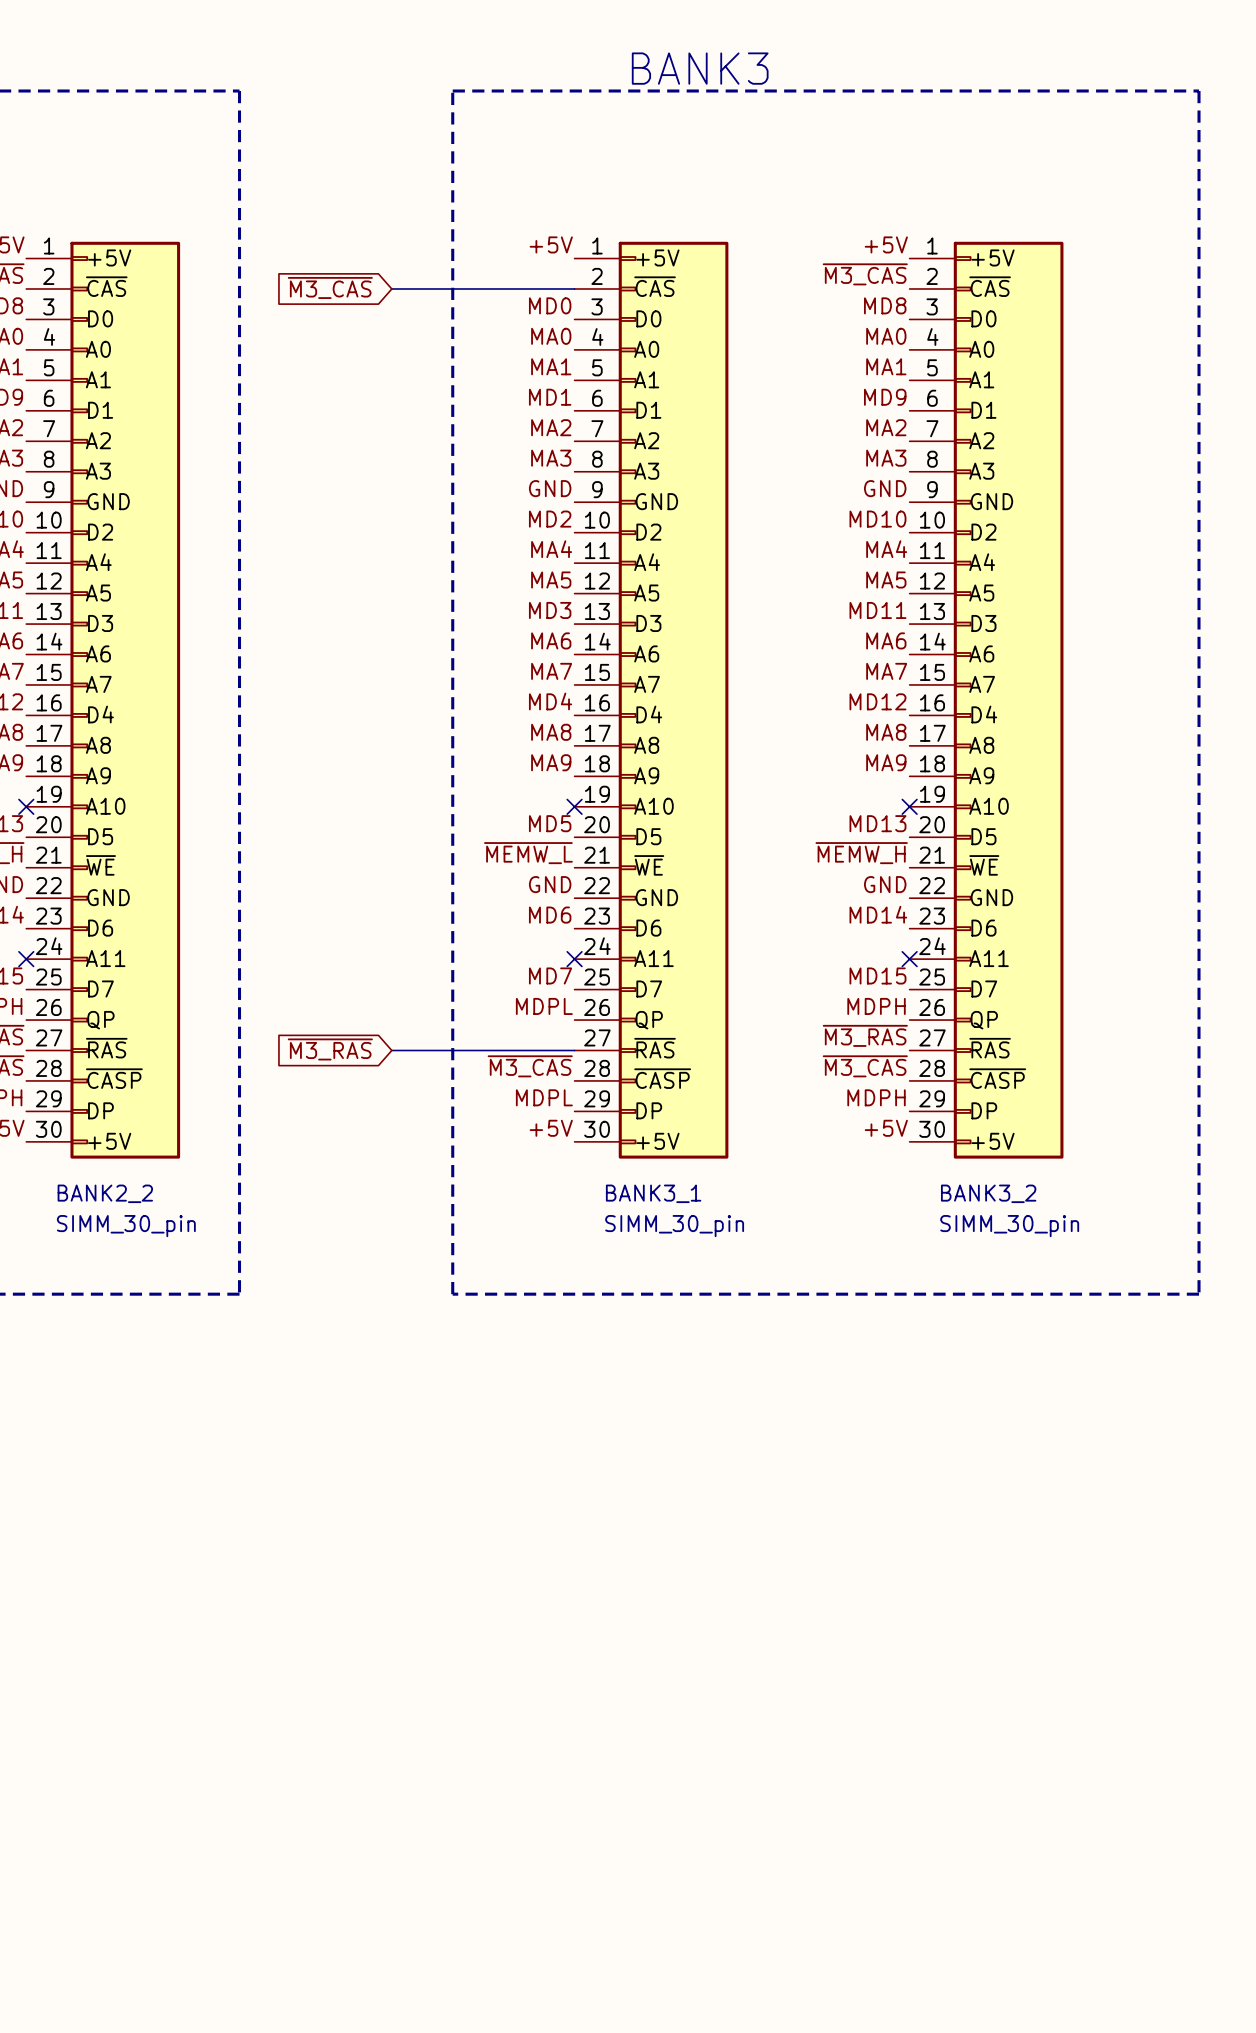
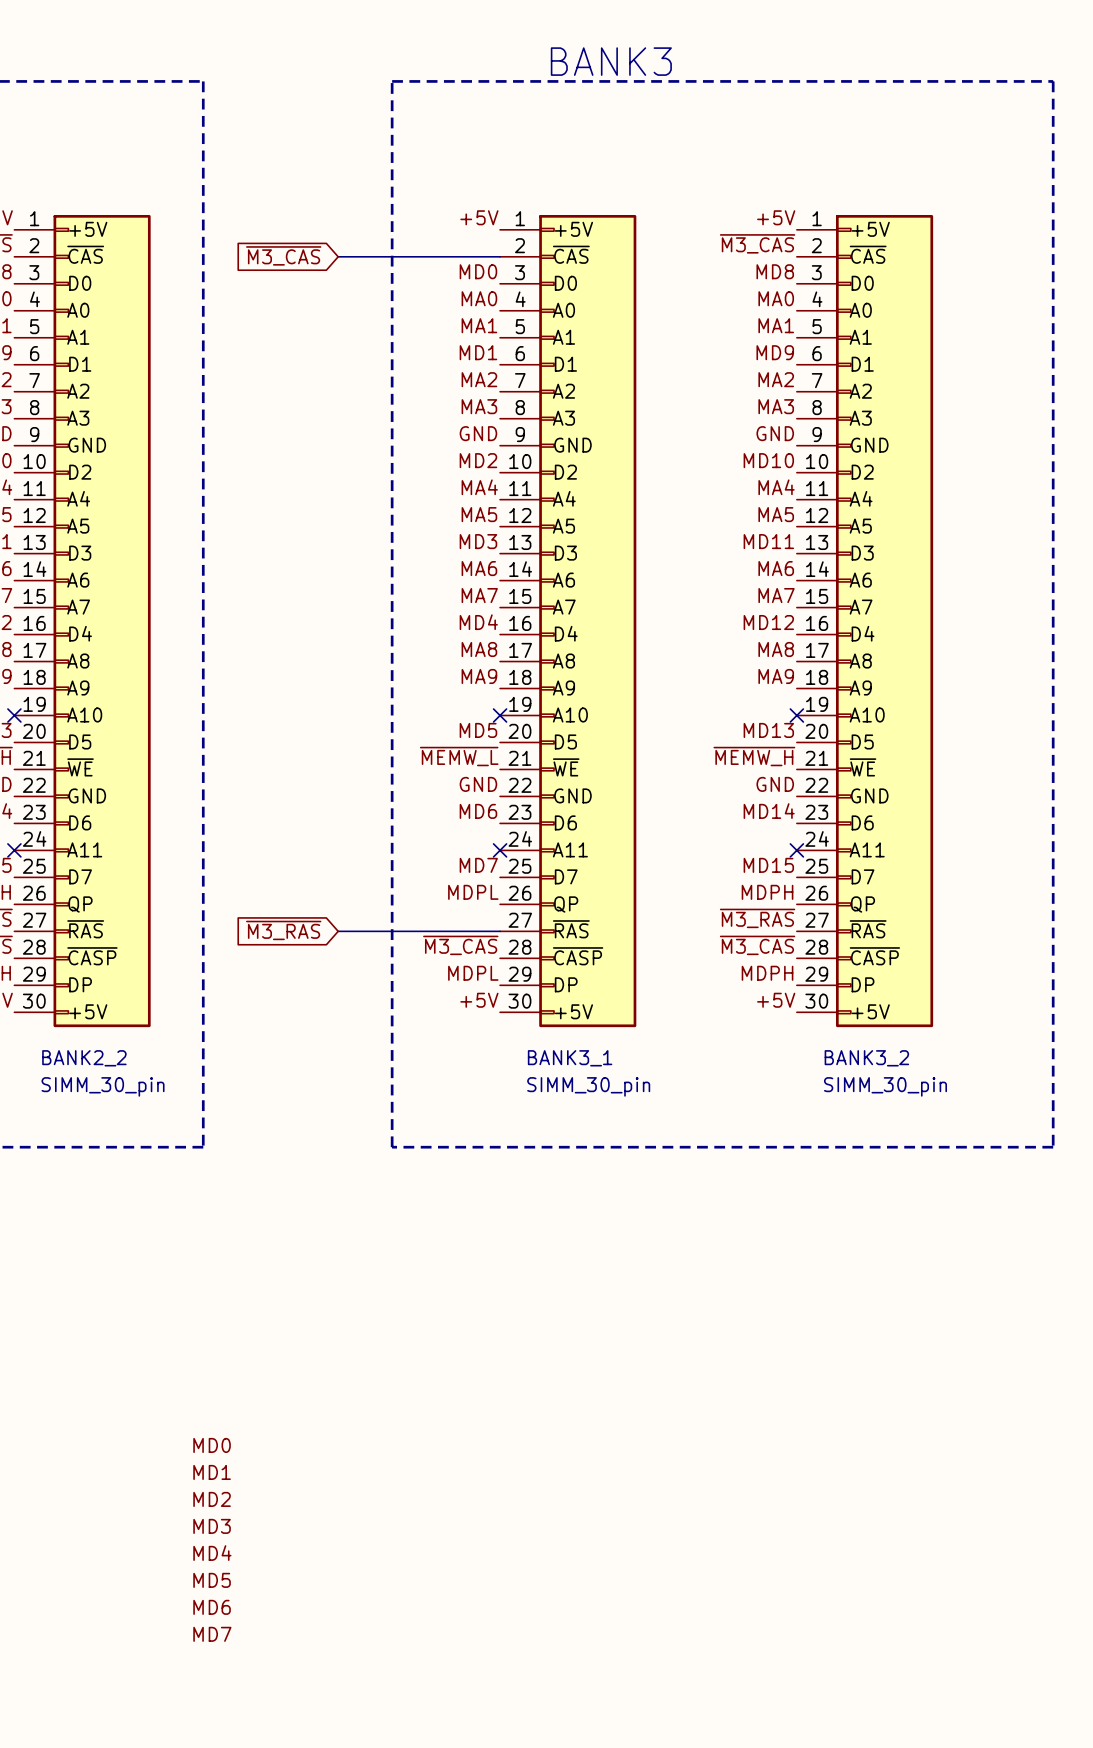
label: none -> MD0 (212, 1445)
label: none -> MD1 (212, 1472)
label: none -> MD2 (212, 1499)
label: none -> MD3 (212, 1526)
label: none -> MD4 (212, 1553)
label: none -> MD5 (212, 1580)
label: none -> MD6 (212, 1607)
label: none -> MD7 (212, 1634)

